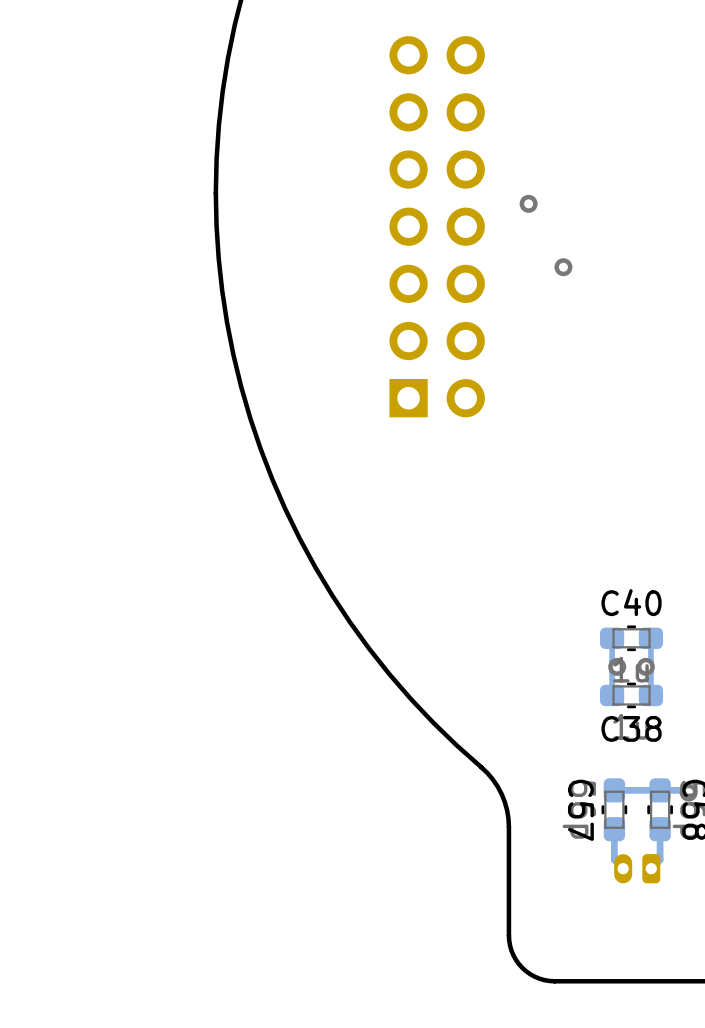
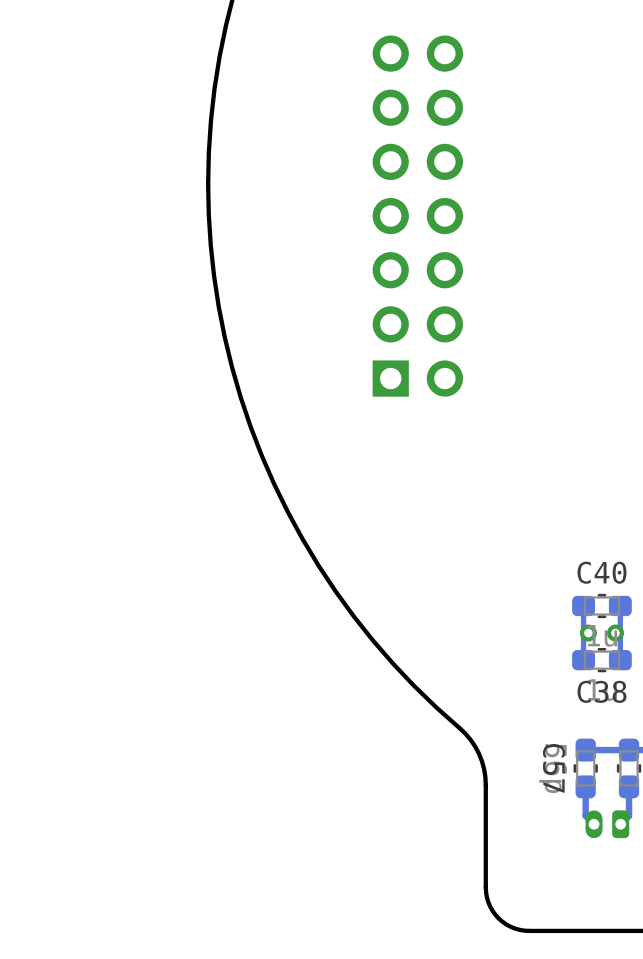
via: (528, 203) -> none
via: (563, 267) -> none

